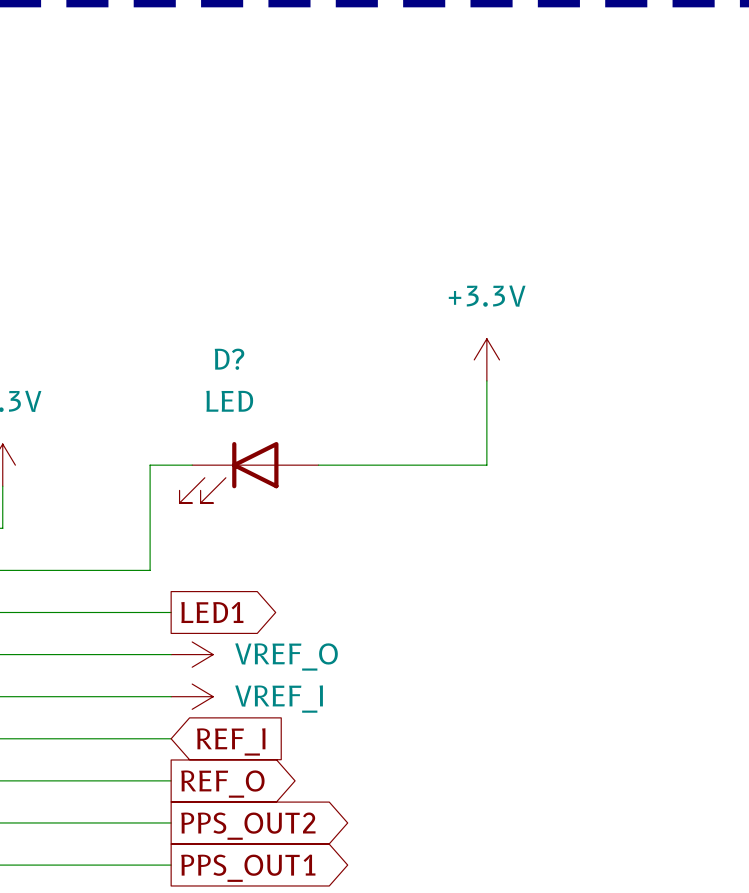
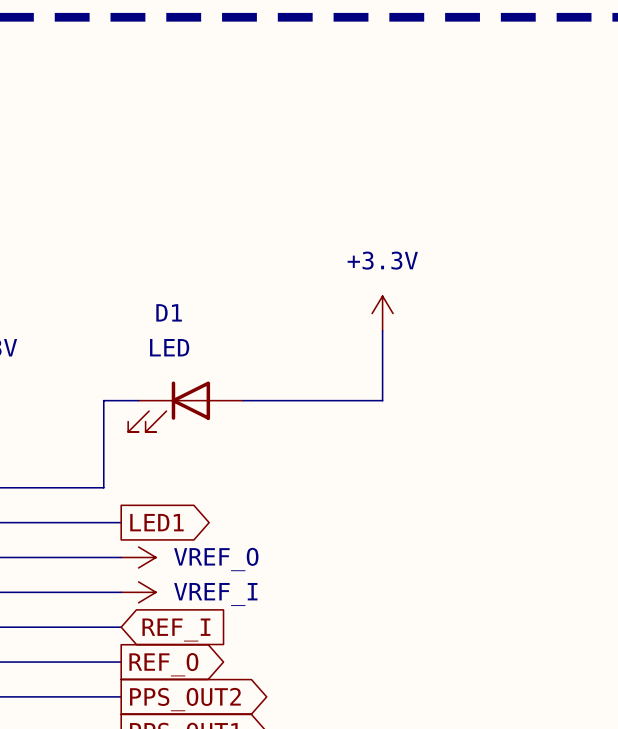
D? name: D? (229, 359) -> D1 (169, 312)

